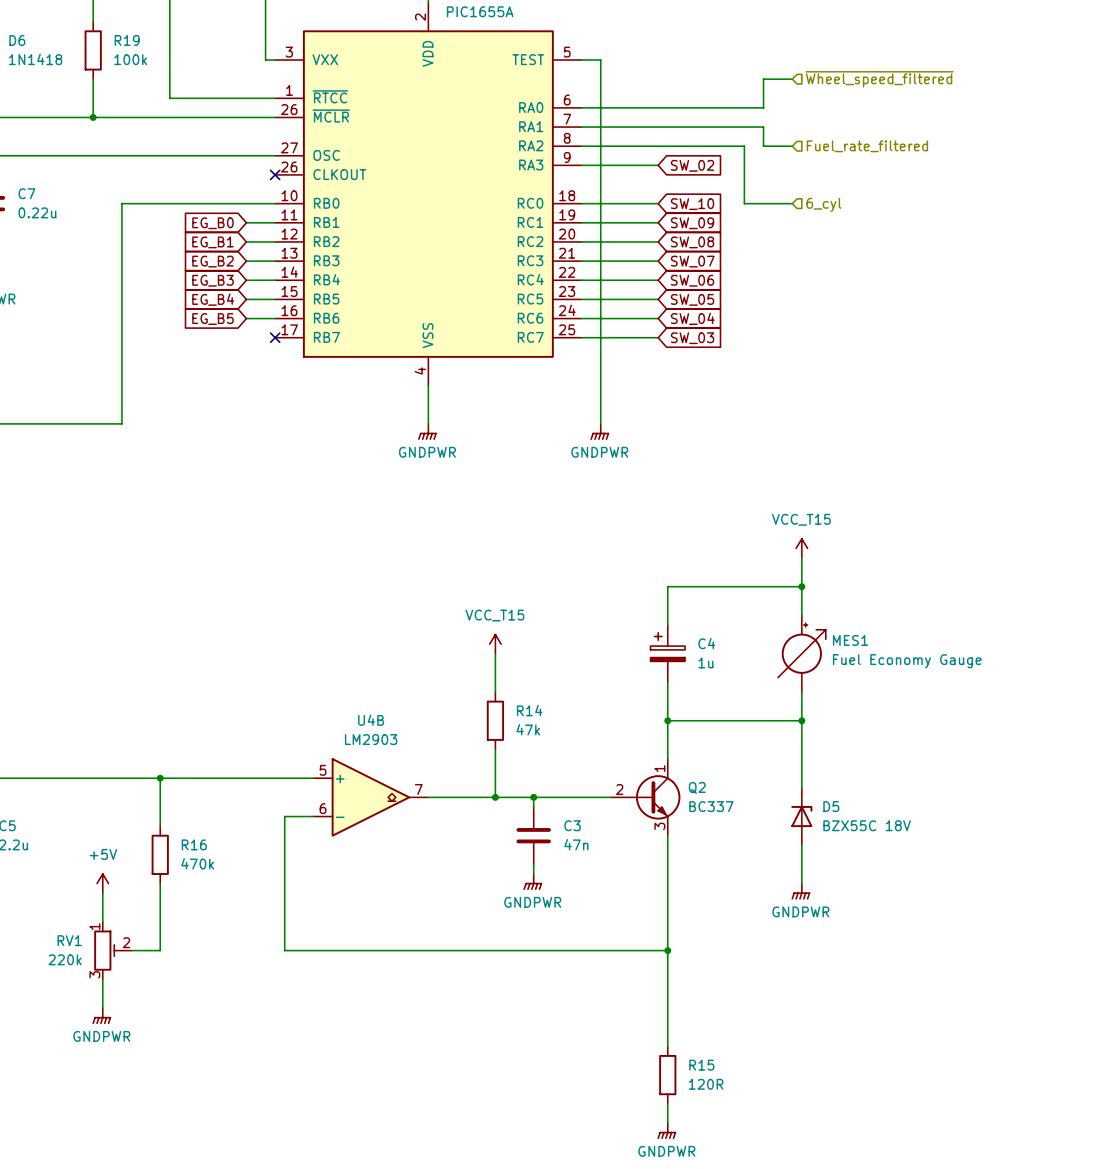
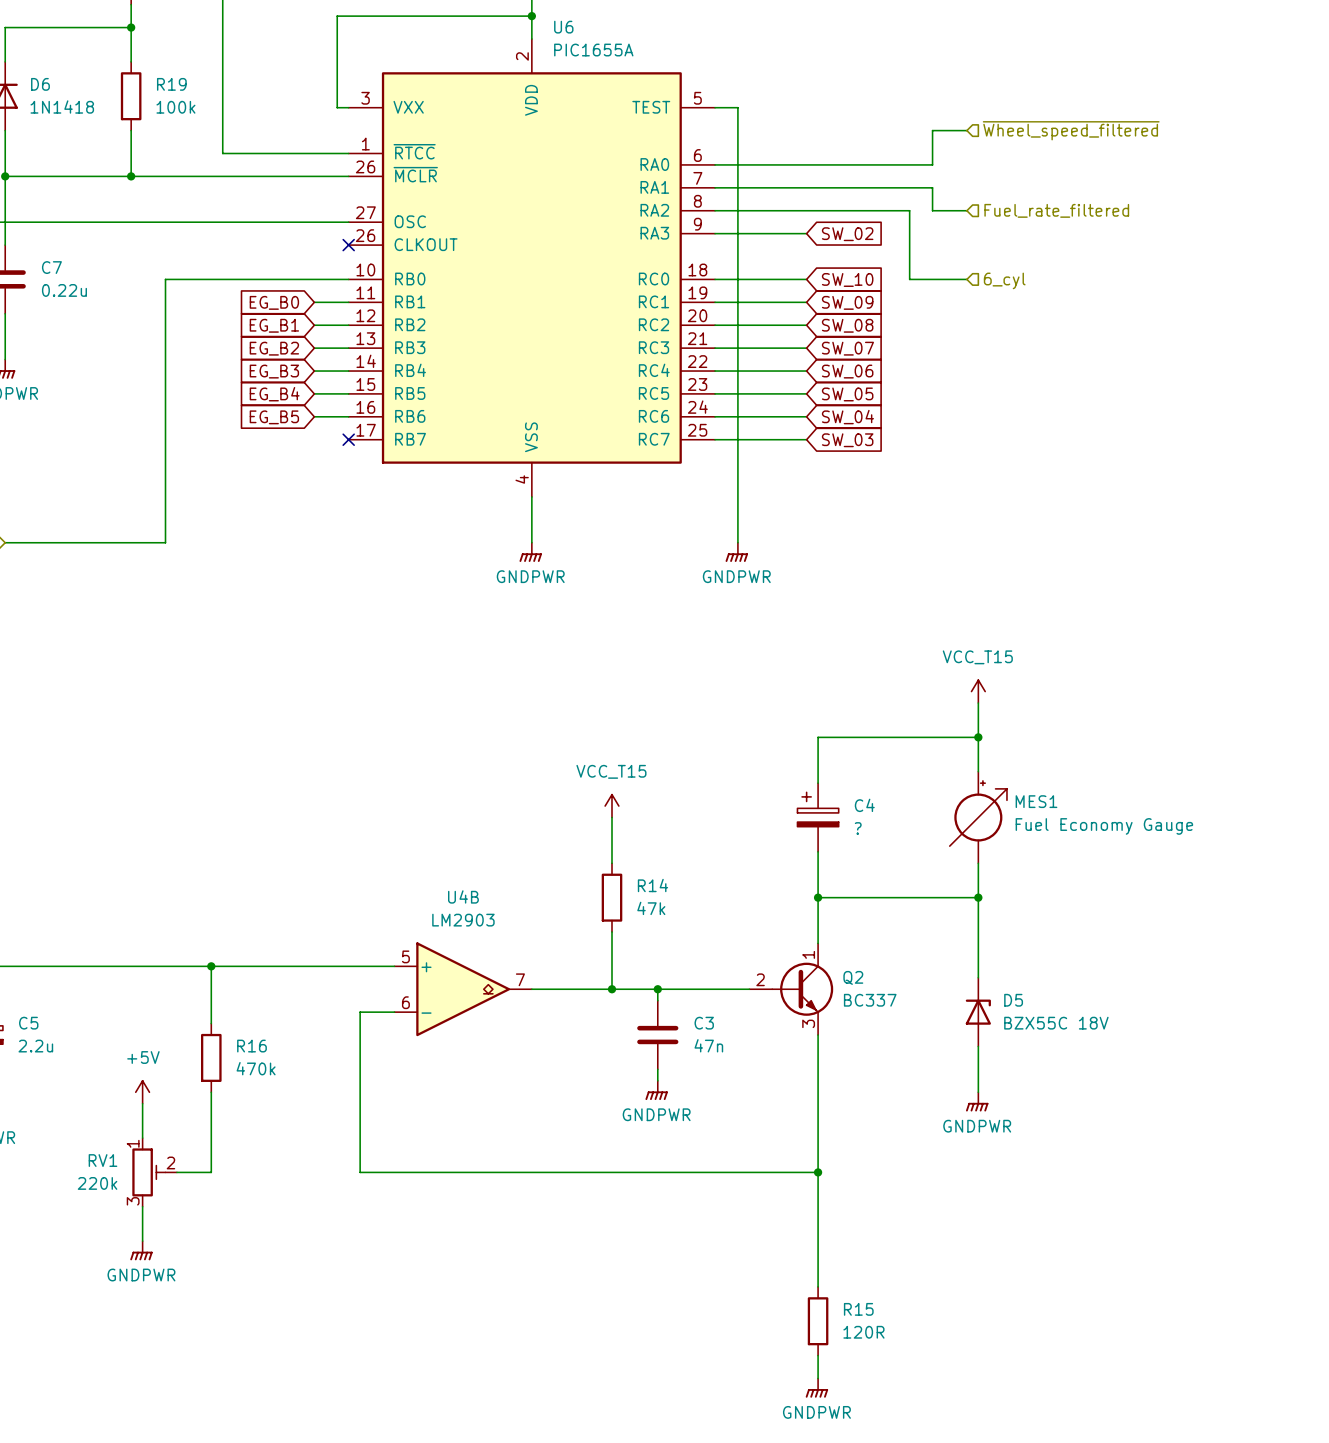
C4 value: 1u (705, 662) -> ? (858, 828)

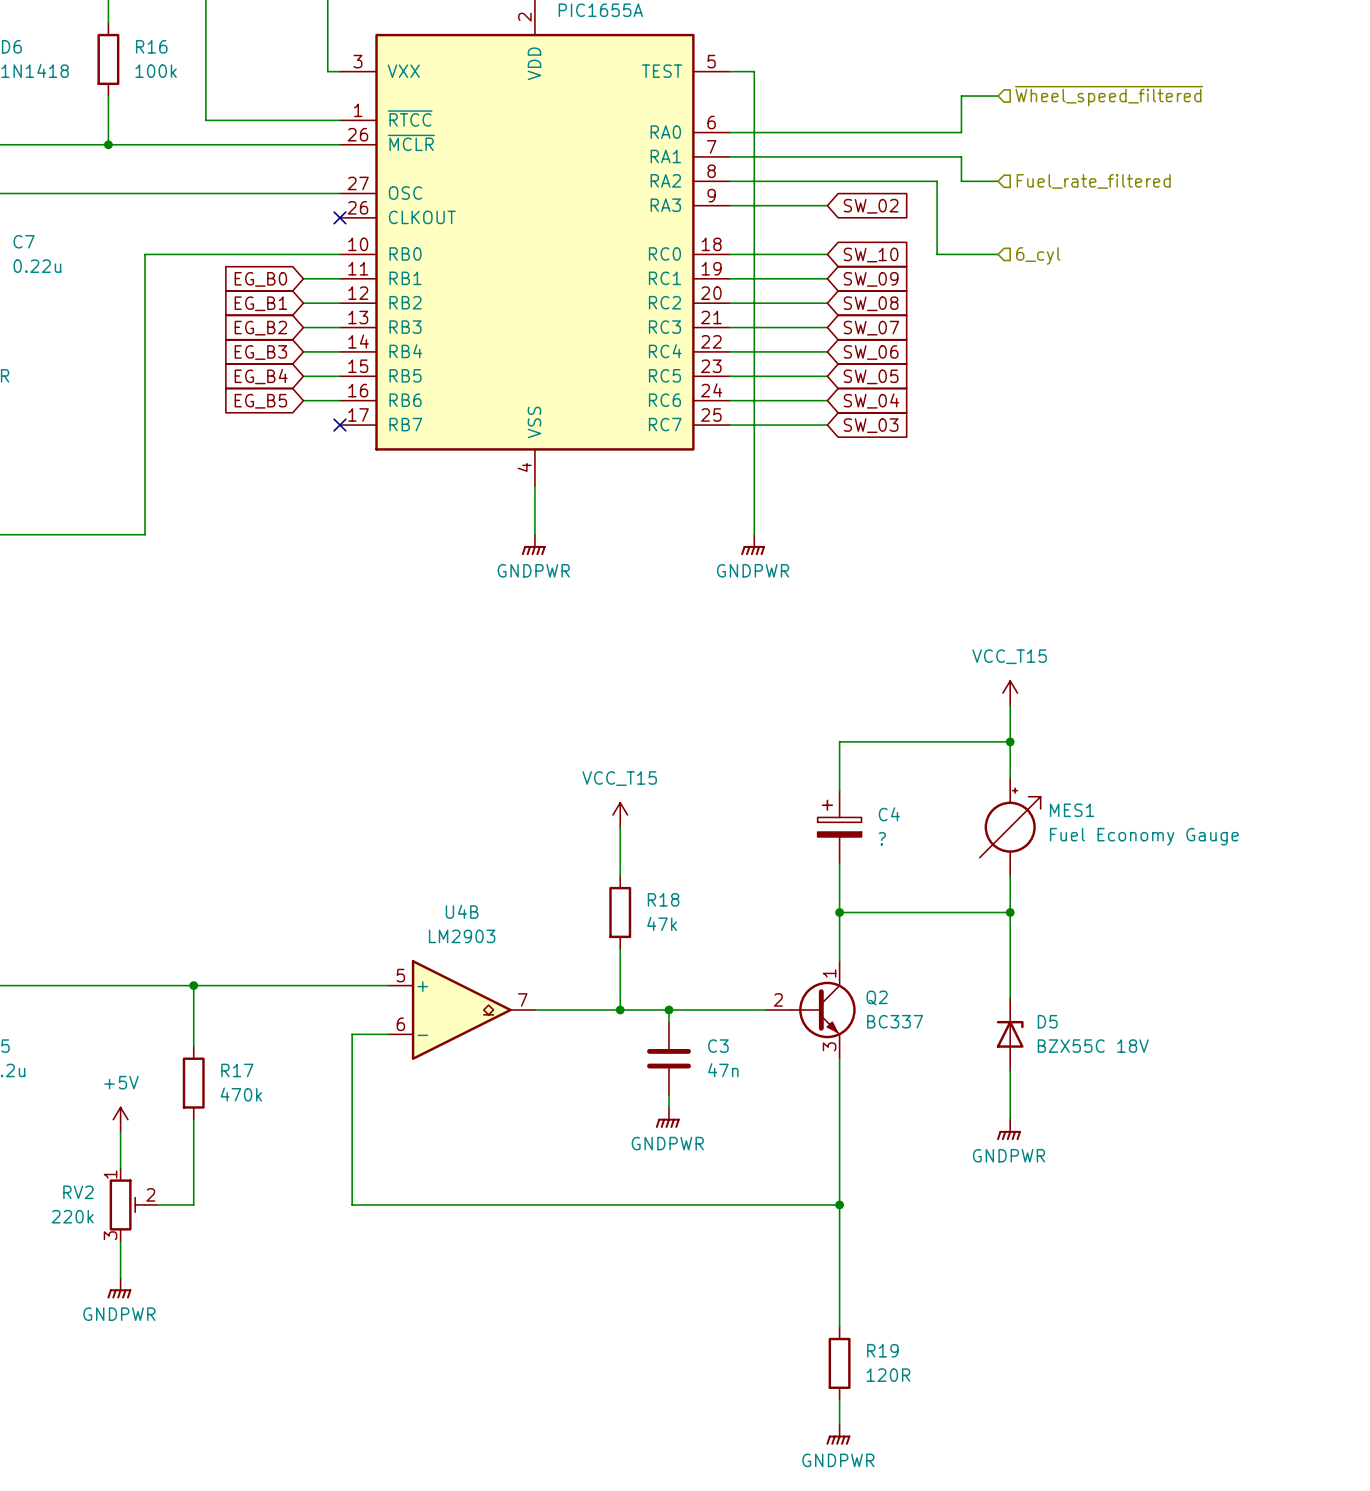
R19 name: R19 (171, 84) -> R16 (151, 46)
R14 name: R14 (652, 885) -> R18 (663, 899)
R16 name: R16 (252, 1046) -> R17 (237, 1070)
RV1 name: RV1 (102, 1160) -> RV2 (78, 1192)
R15 name: R15 (858, 1309) -> R19 (882, 1350)

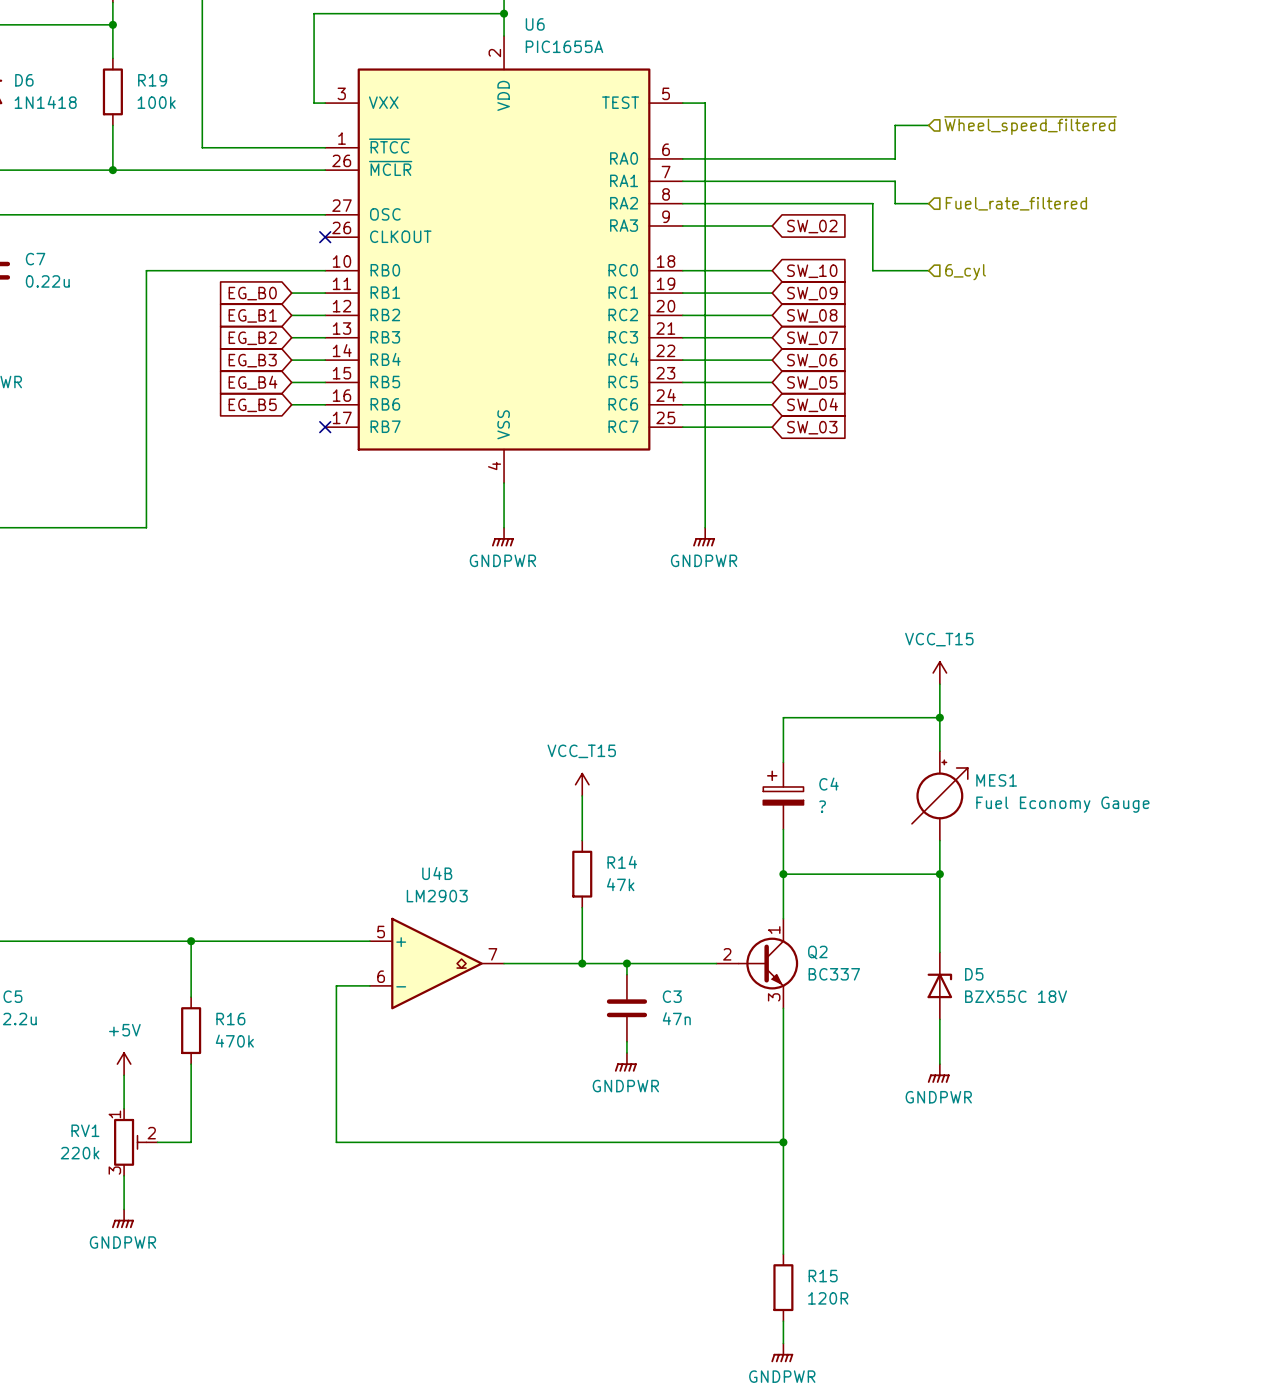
R16 name: R16 (151, 46) -> R19 (152, 80)
R18 name: R18 (663, 899) -> R14 (622, 862)
R17 name: R17 (237, 1070) -> R16 (230, 1019)
RV2 name: RV2 (78, 1192) -> RV1 (85, 1130)
R19 name: R19 (882, 1350) -> R15 (823, 1276)

